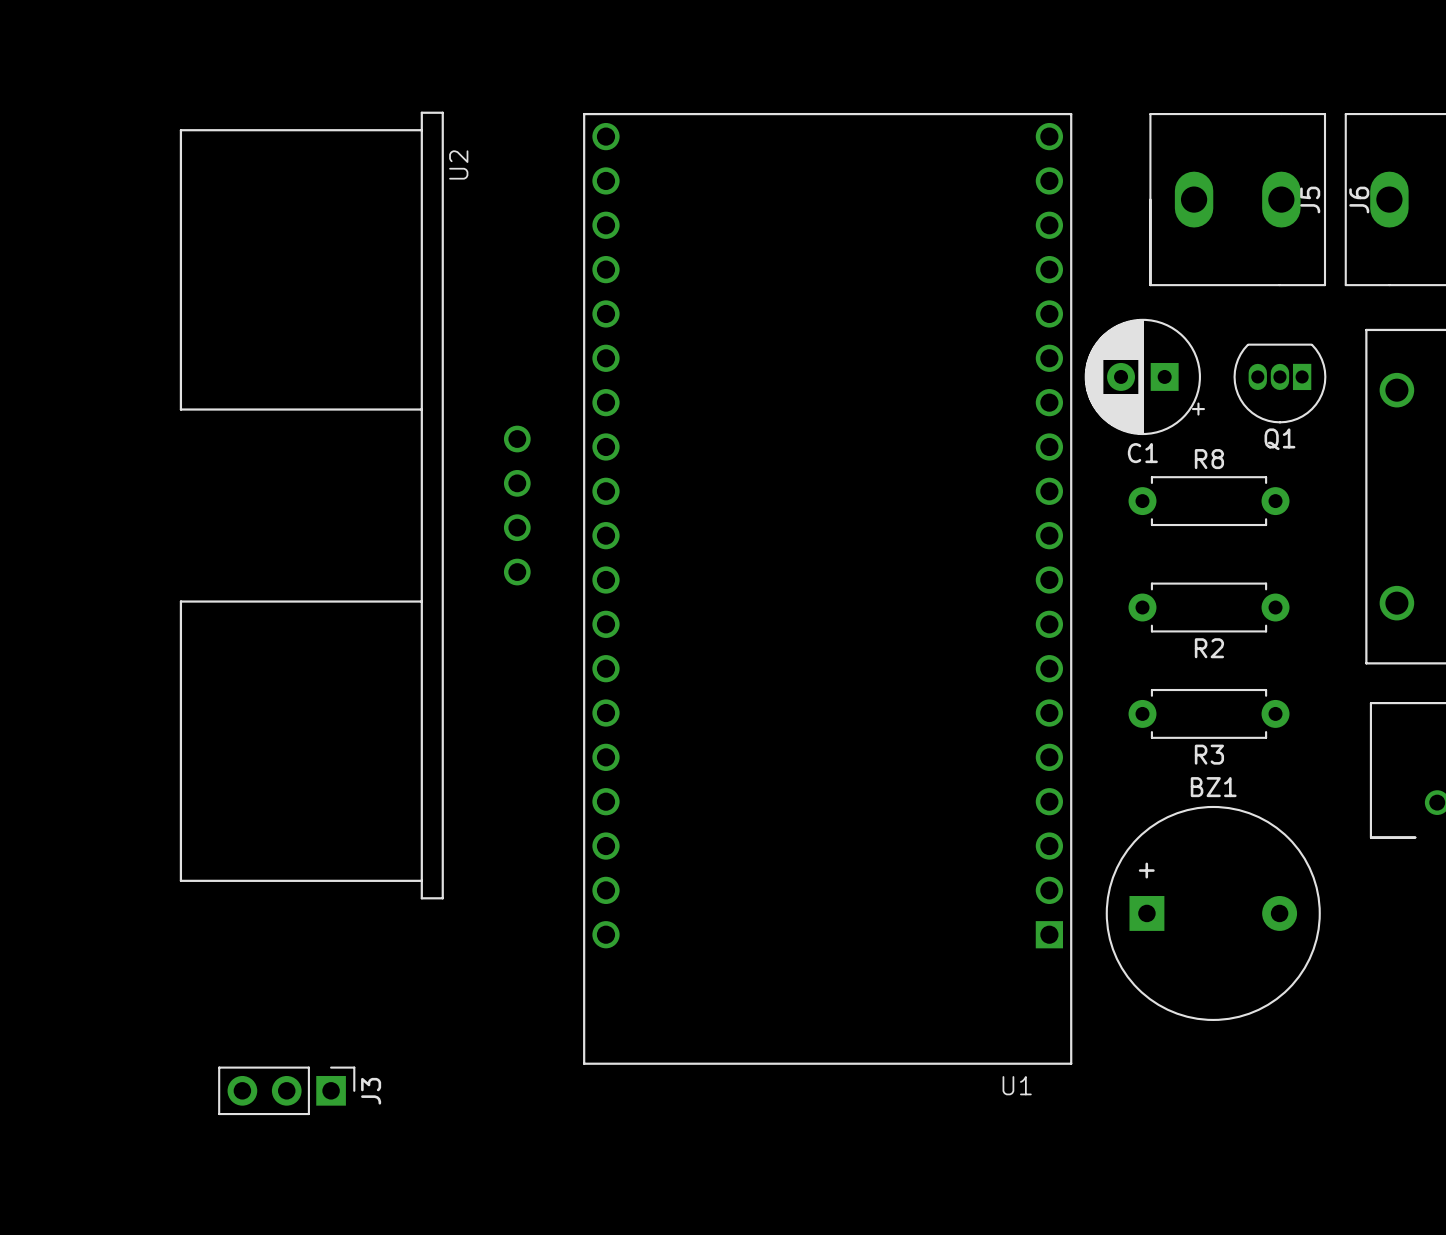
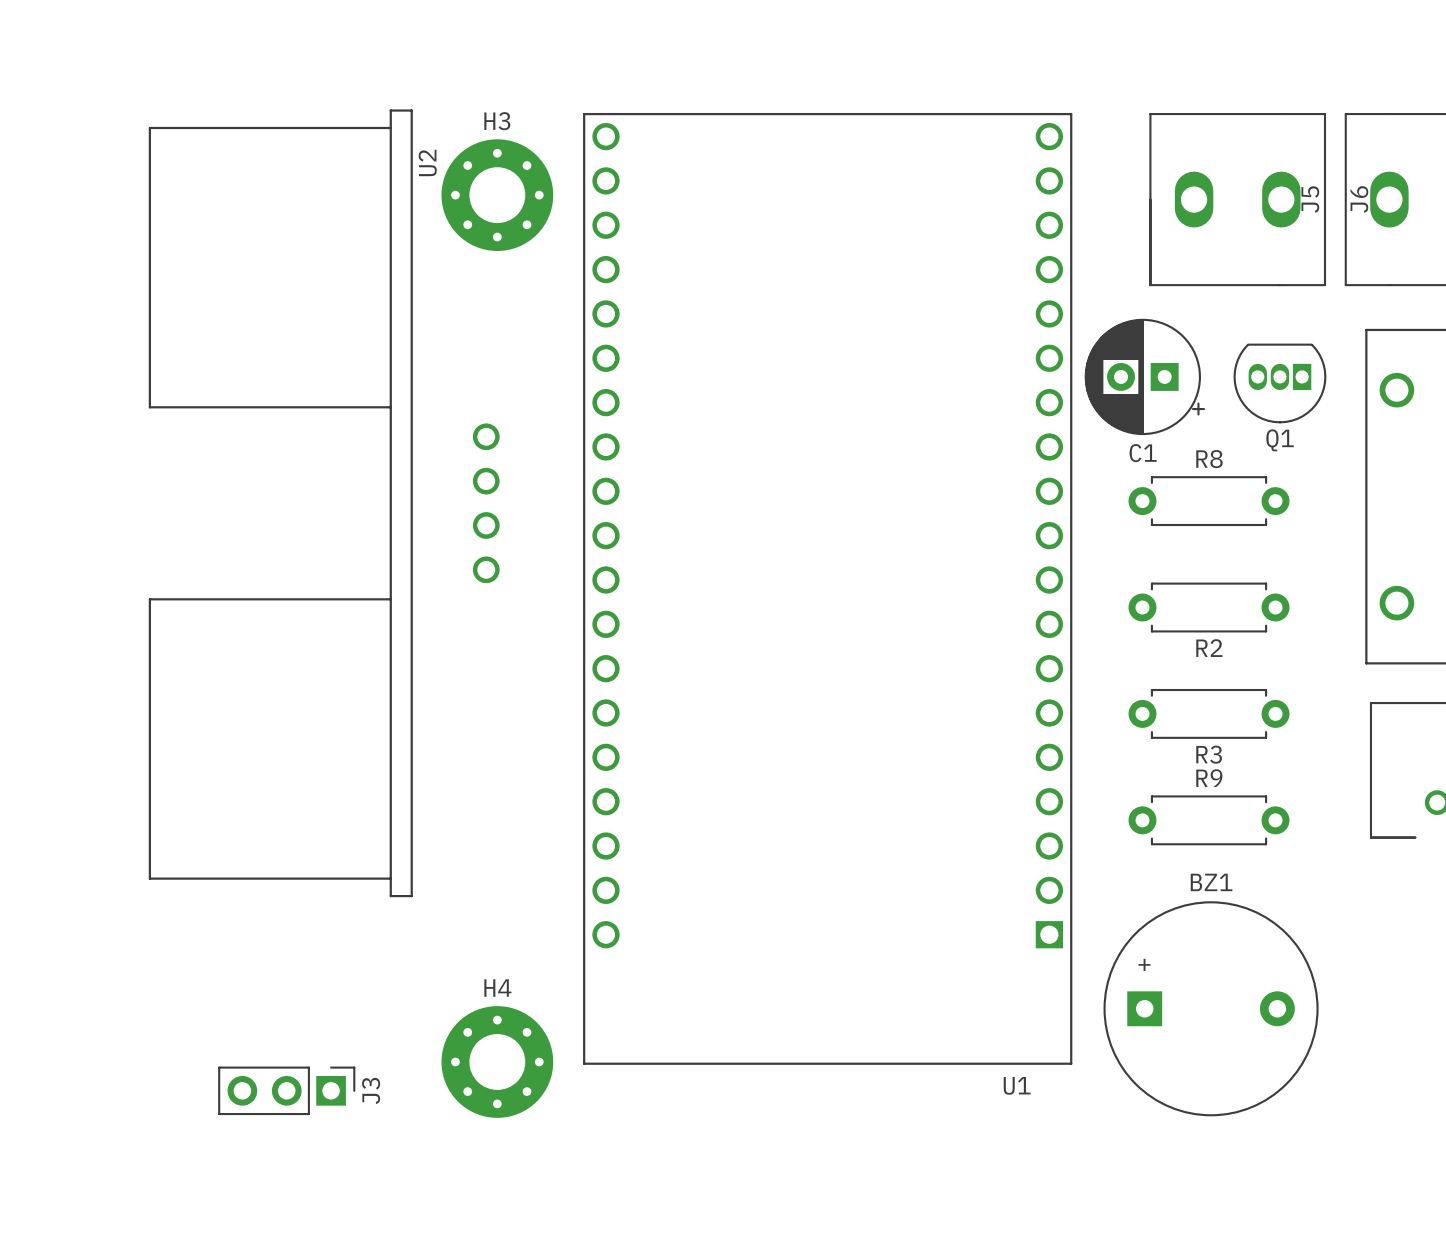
H3: none -> (497, 195)
U2 position: (355, 505) -> (324, 503)
R9: none -> (1209, 820)
BZ1 position: (1213, 913) -> (1211, 1008)
H4: none -> (497, 1061)

